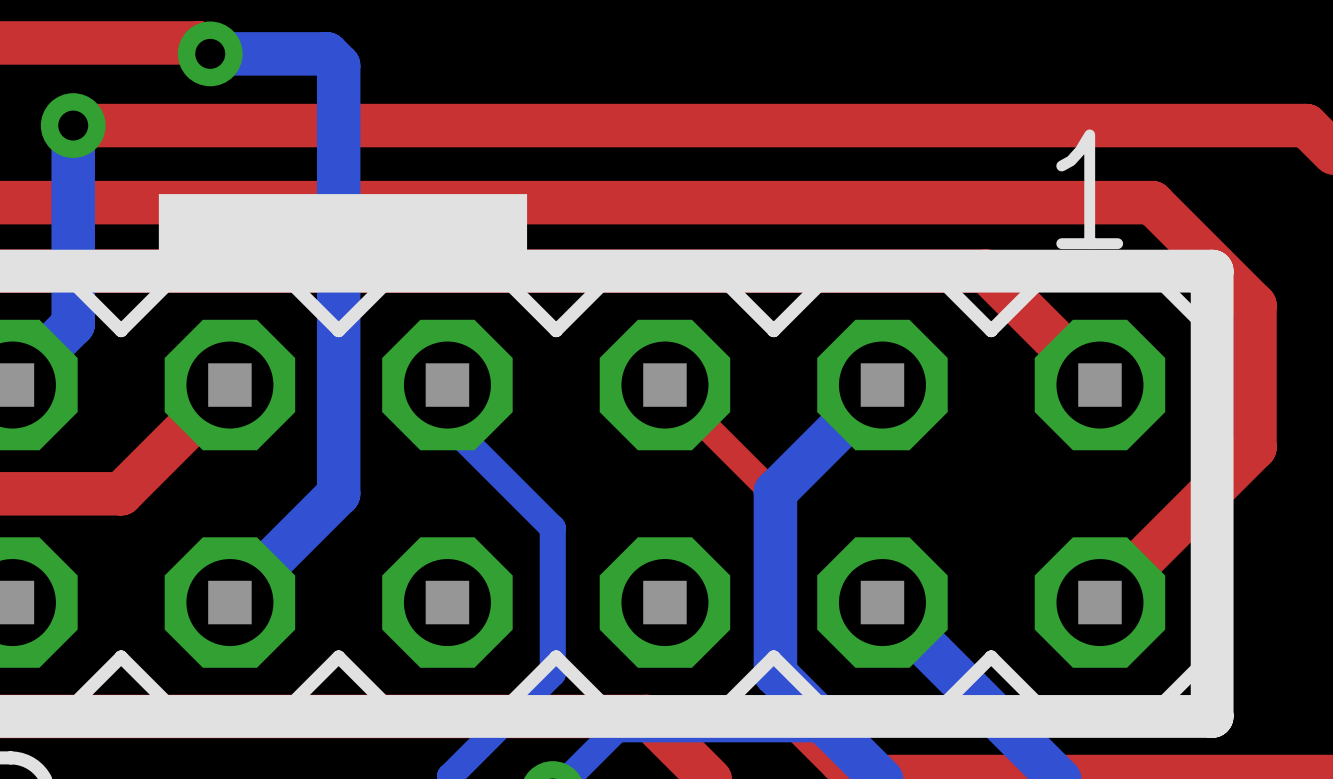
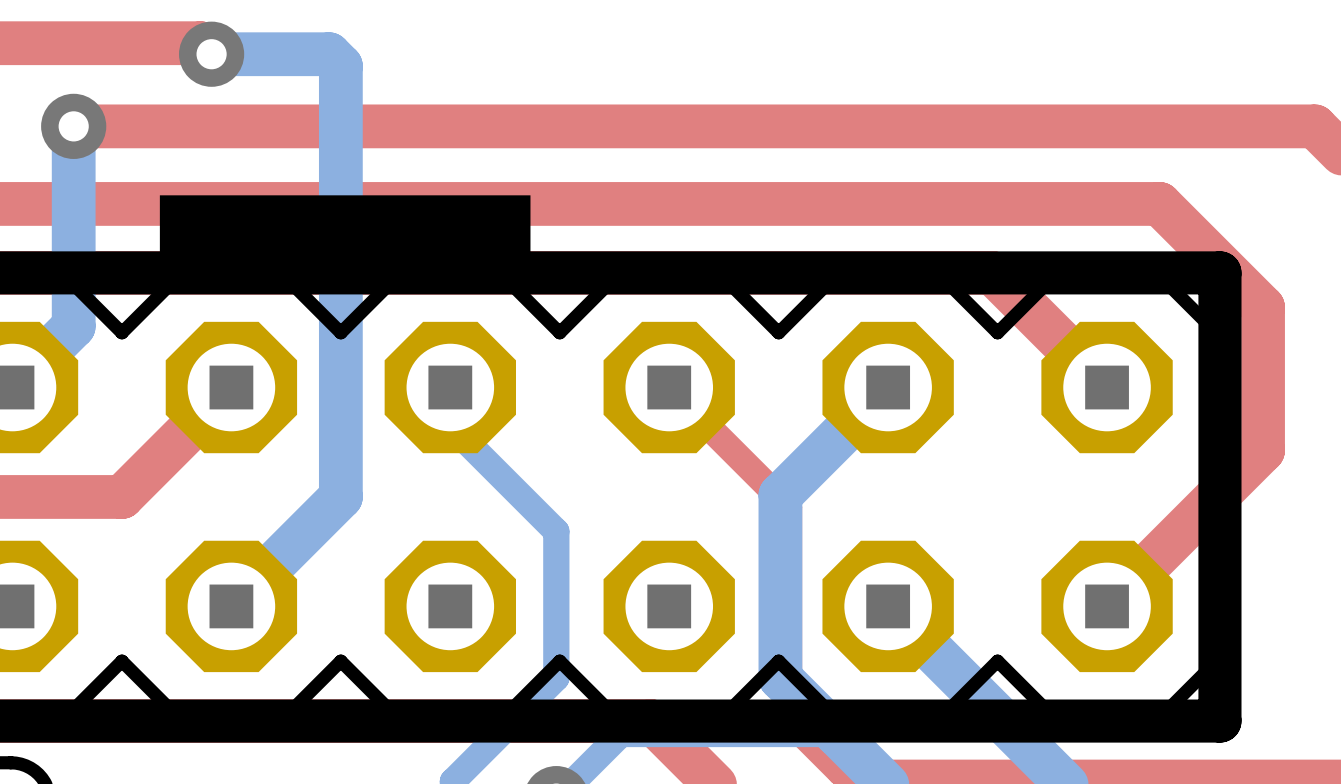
part text: 1 (1089, 189) -> none

